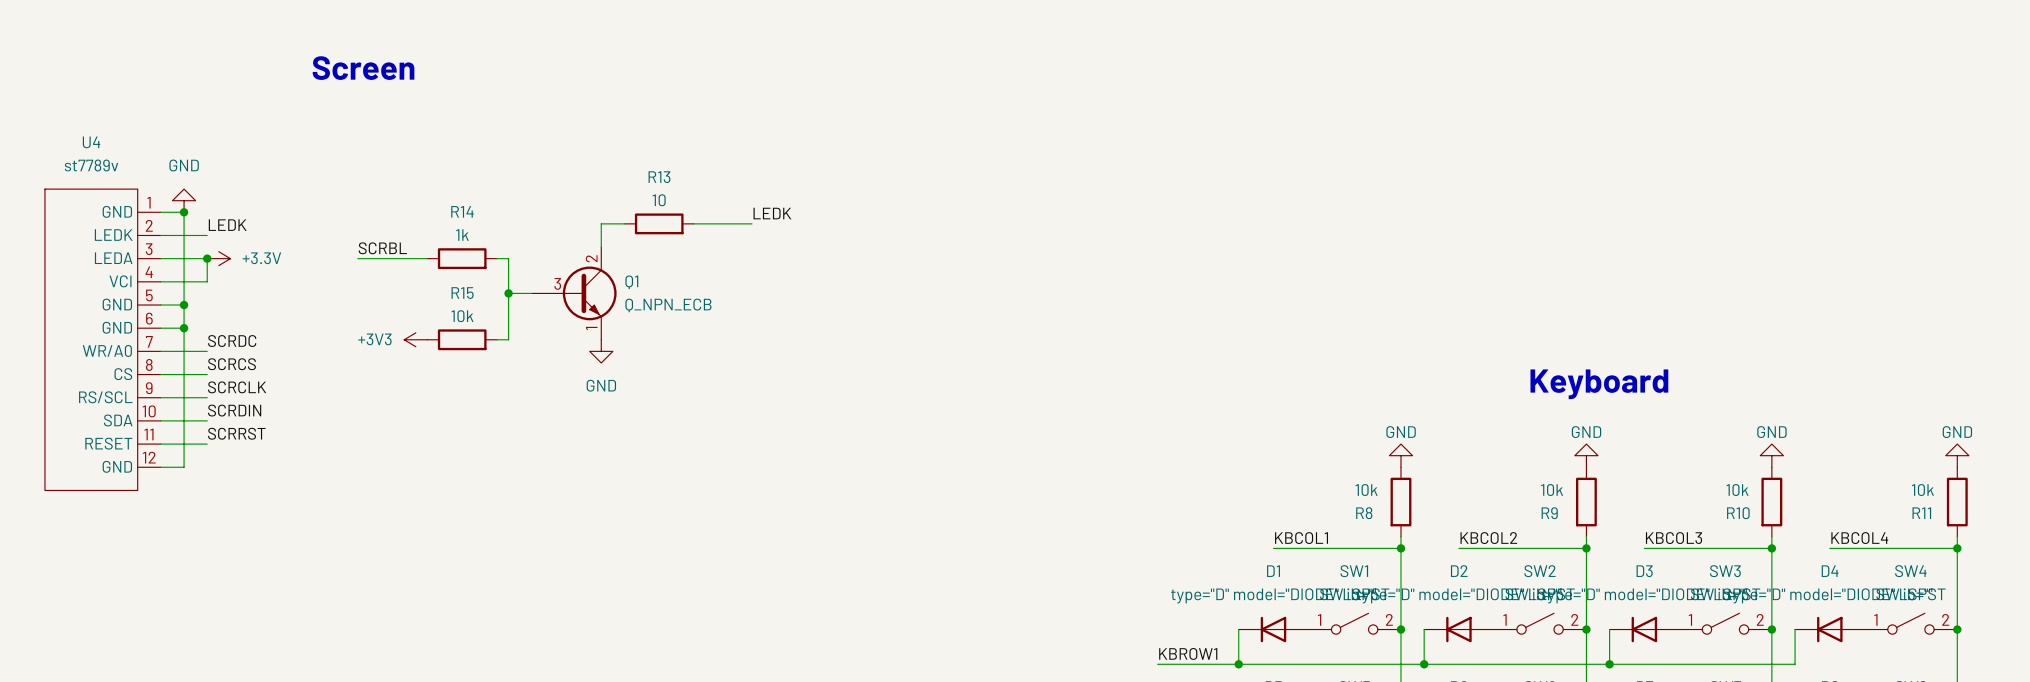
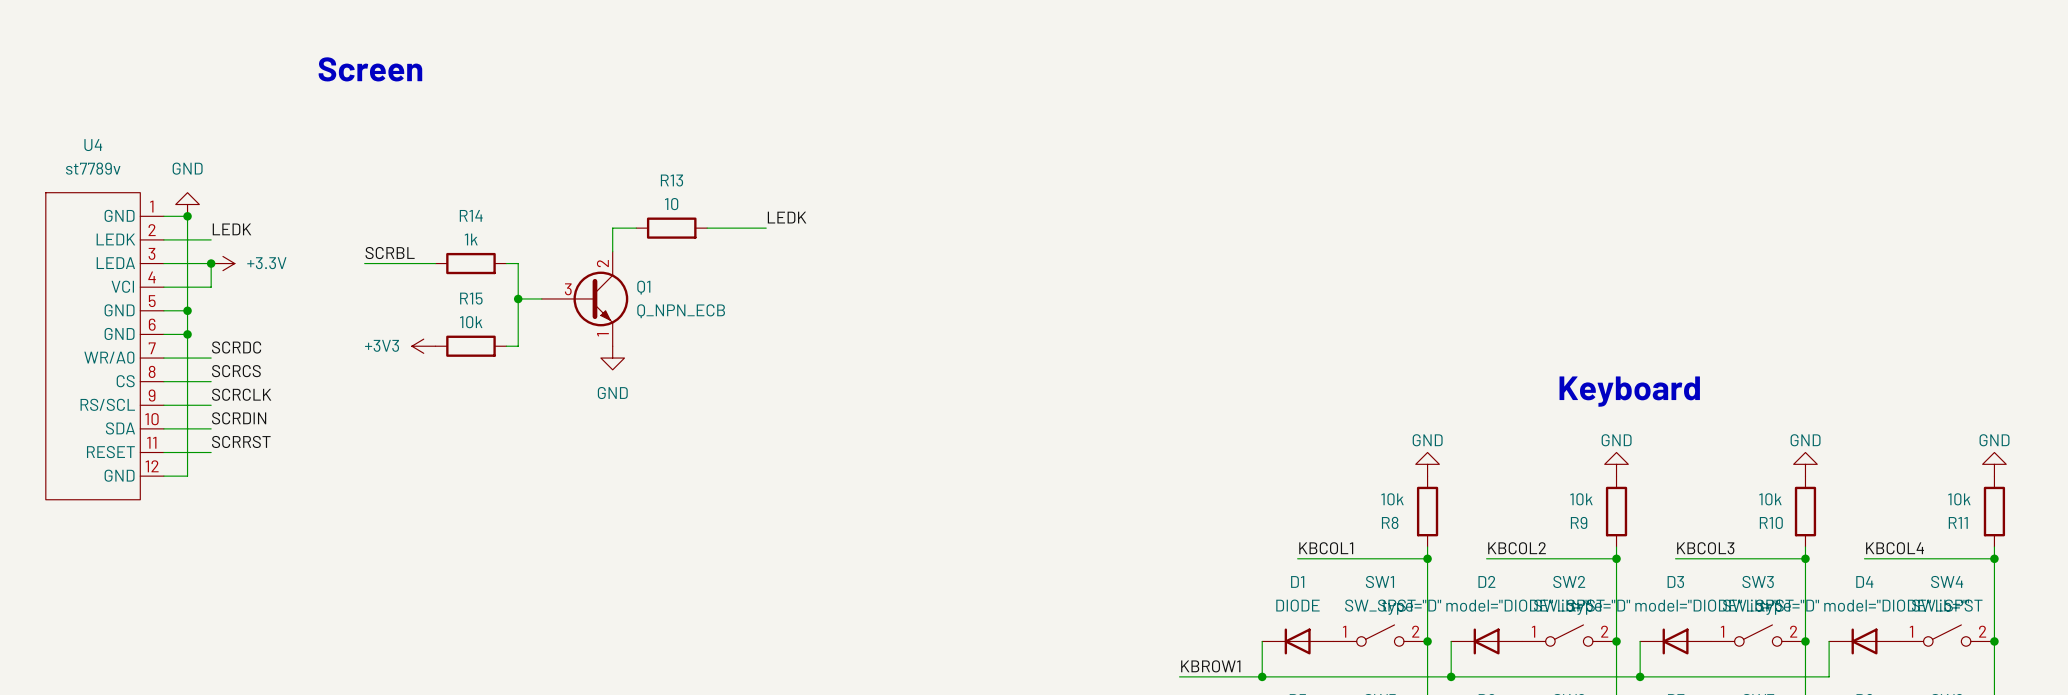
D1 value: type="D" model="DIODE" lib="" (1273, 595) -> DIODE (1297, 605)

